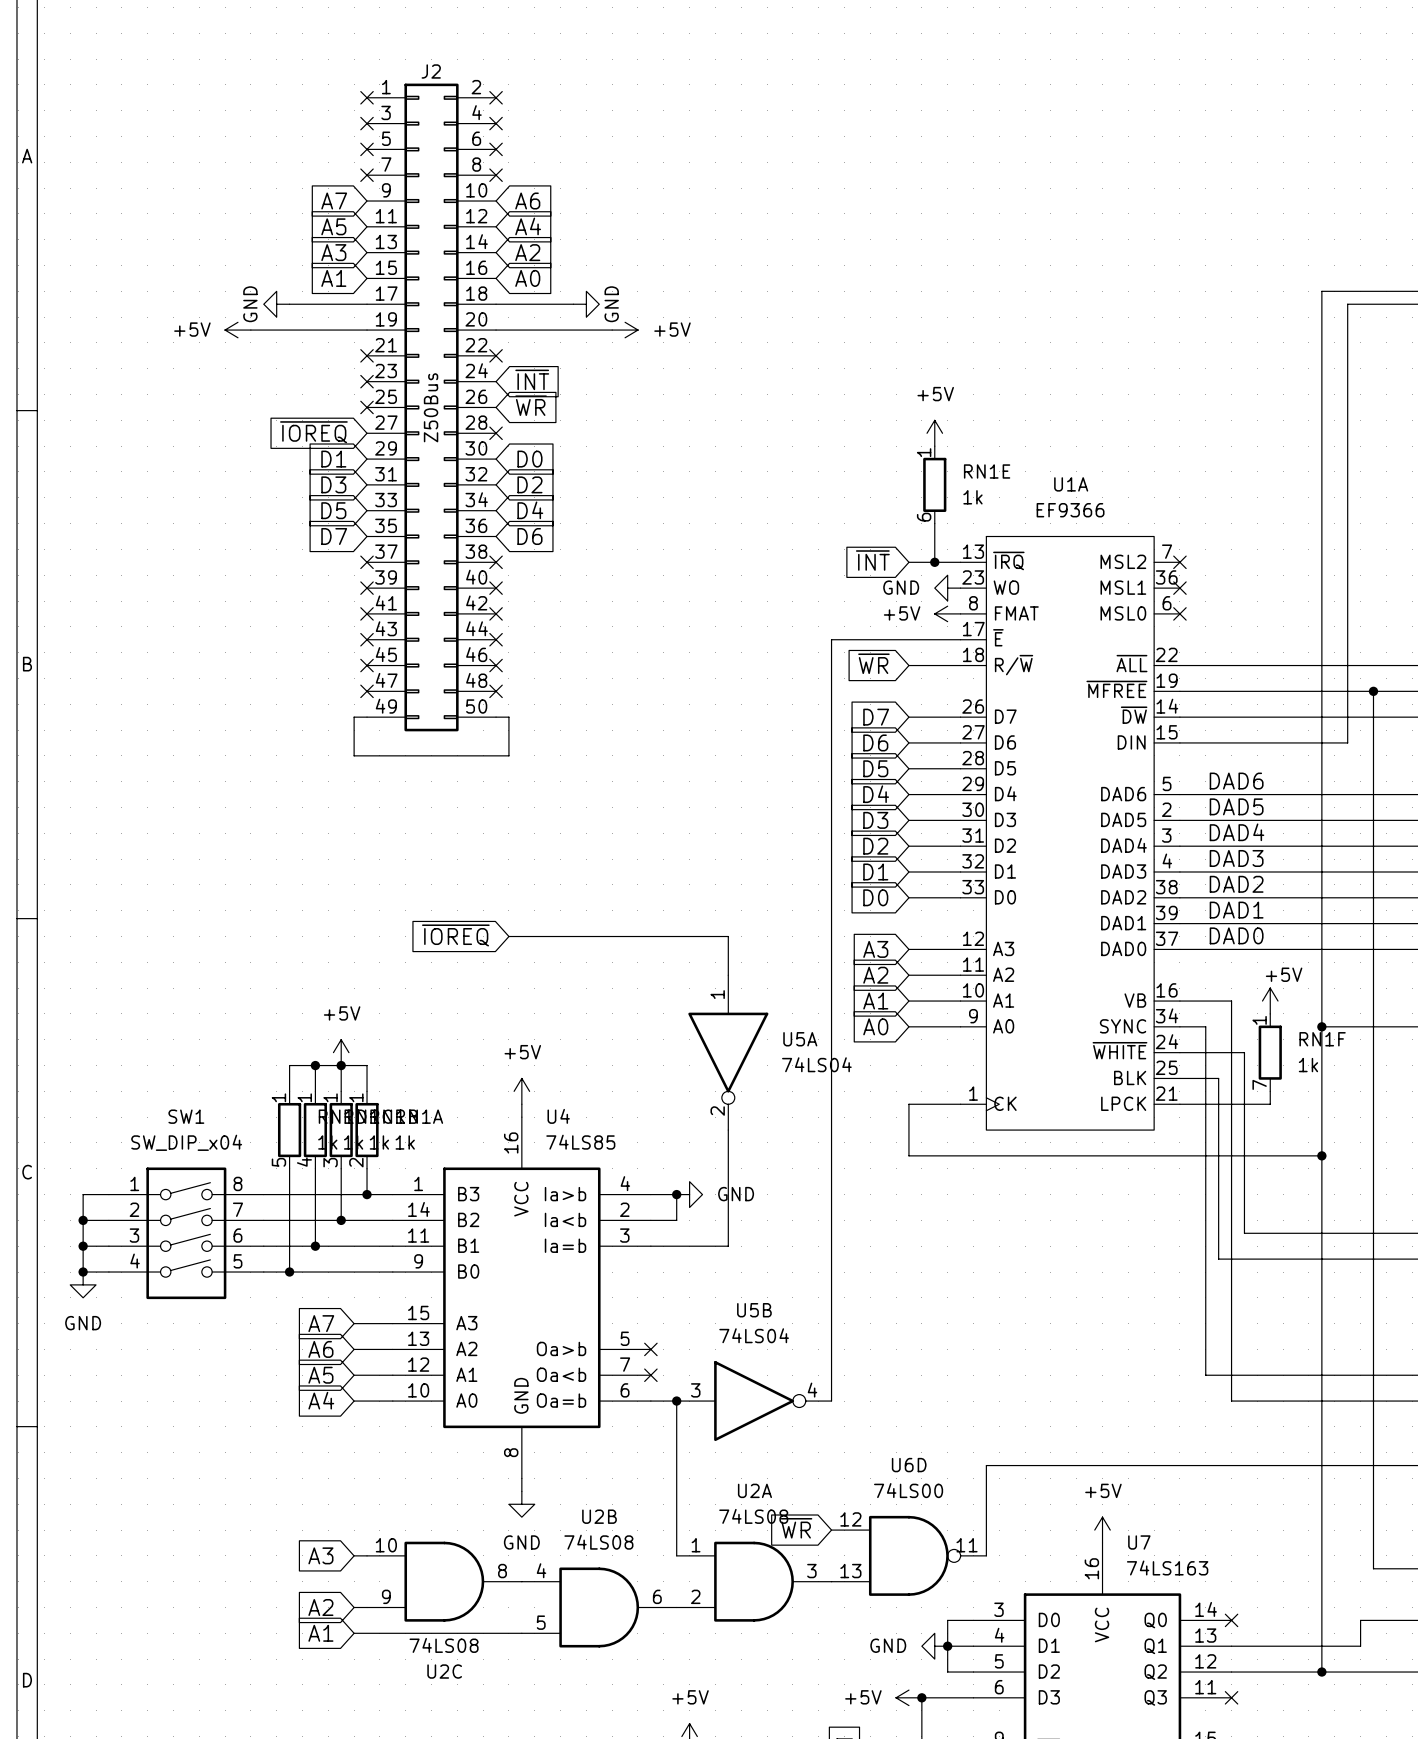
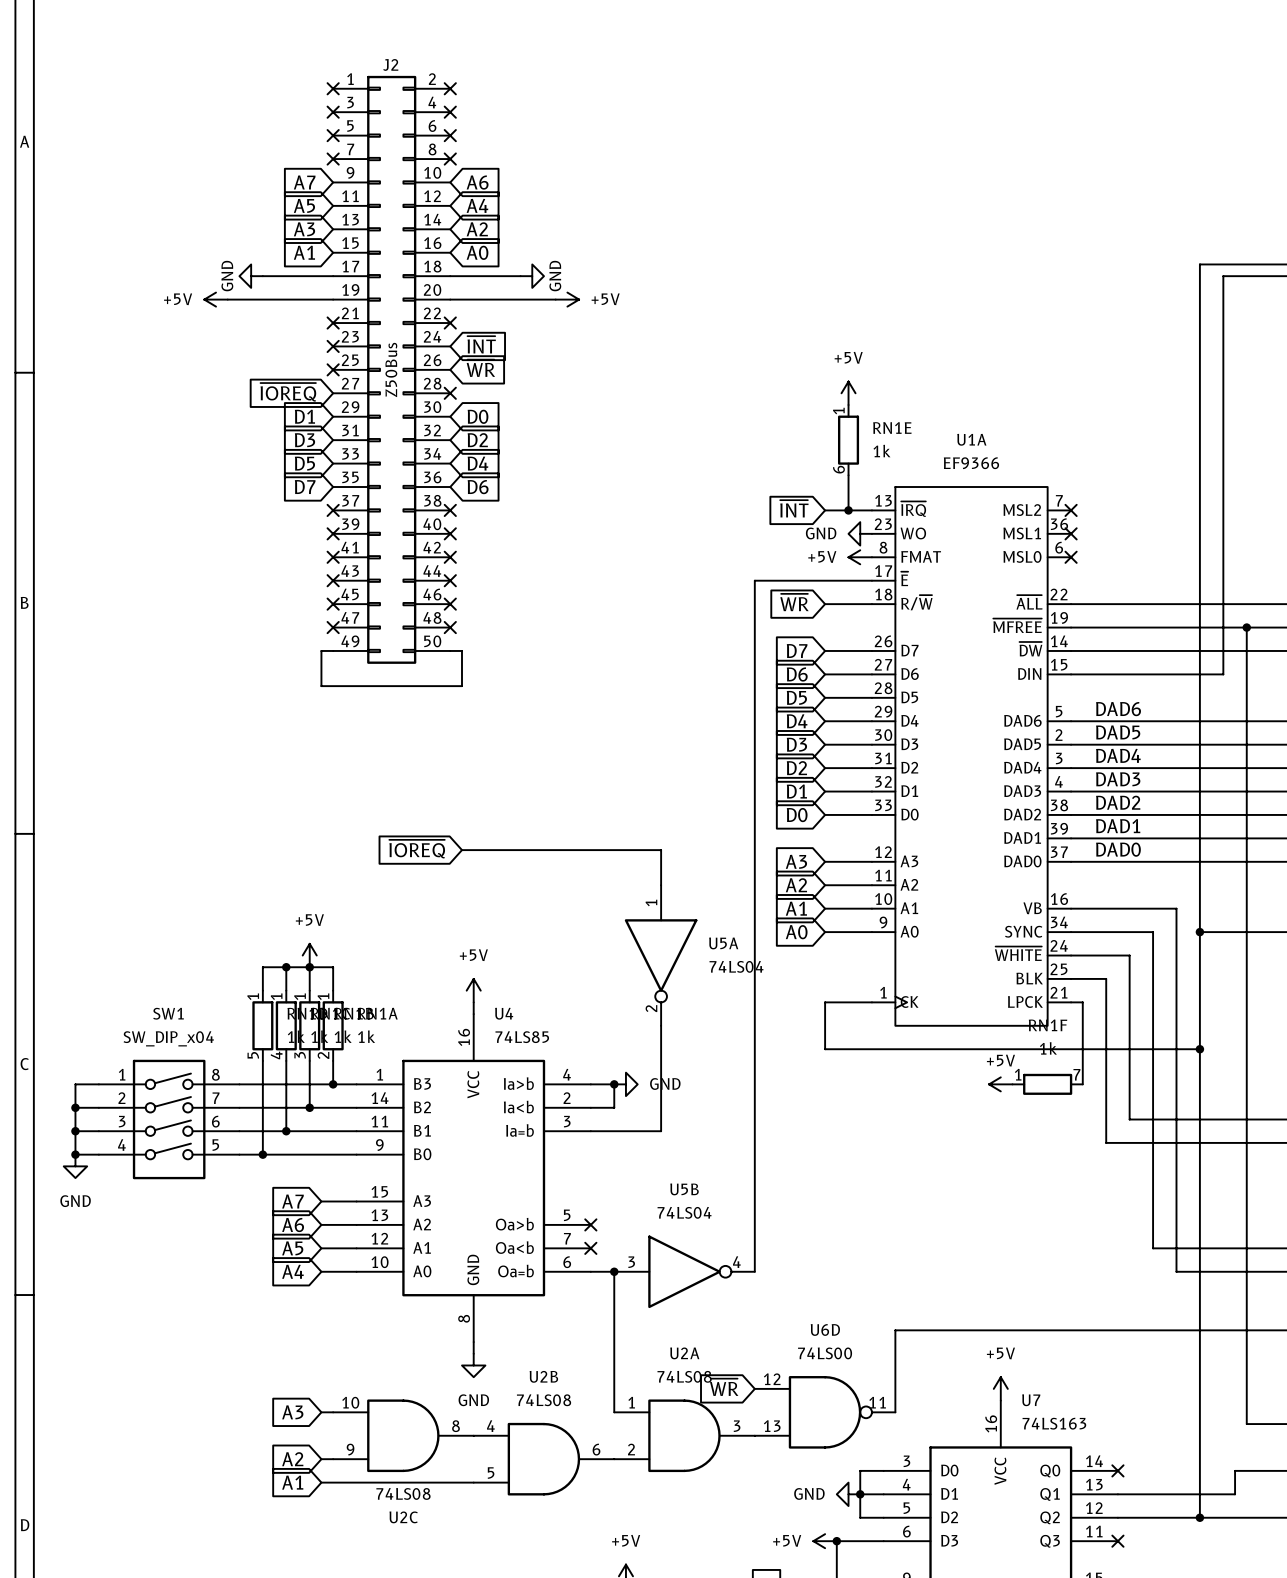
wire: (1231, 1001) (1231, 1401) (1296, 1401) -> (1117, 908) (1176, 908) (1176, 1271)
power symbol: +5V (1270, 1001) -> none
wire: (1205, 1026) (1205, 1375) (1270, 1375) -> (1153, 1002) (1153, 1248)
wire: none -> (1094, 932) (1153, 932) (1153, 990)
RN1F rotation: 0° (1270, 1052) -> 90° counterclockwise (1047, 1084)
RN1F position: (1270, 1052) -> (1047, 1084)
wire: (1192, 1104) (1270, 1104) -> (1082, 1002) (1082, 1084)
power symbol: none -> +5V (1000, 1084)

